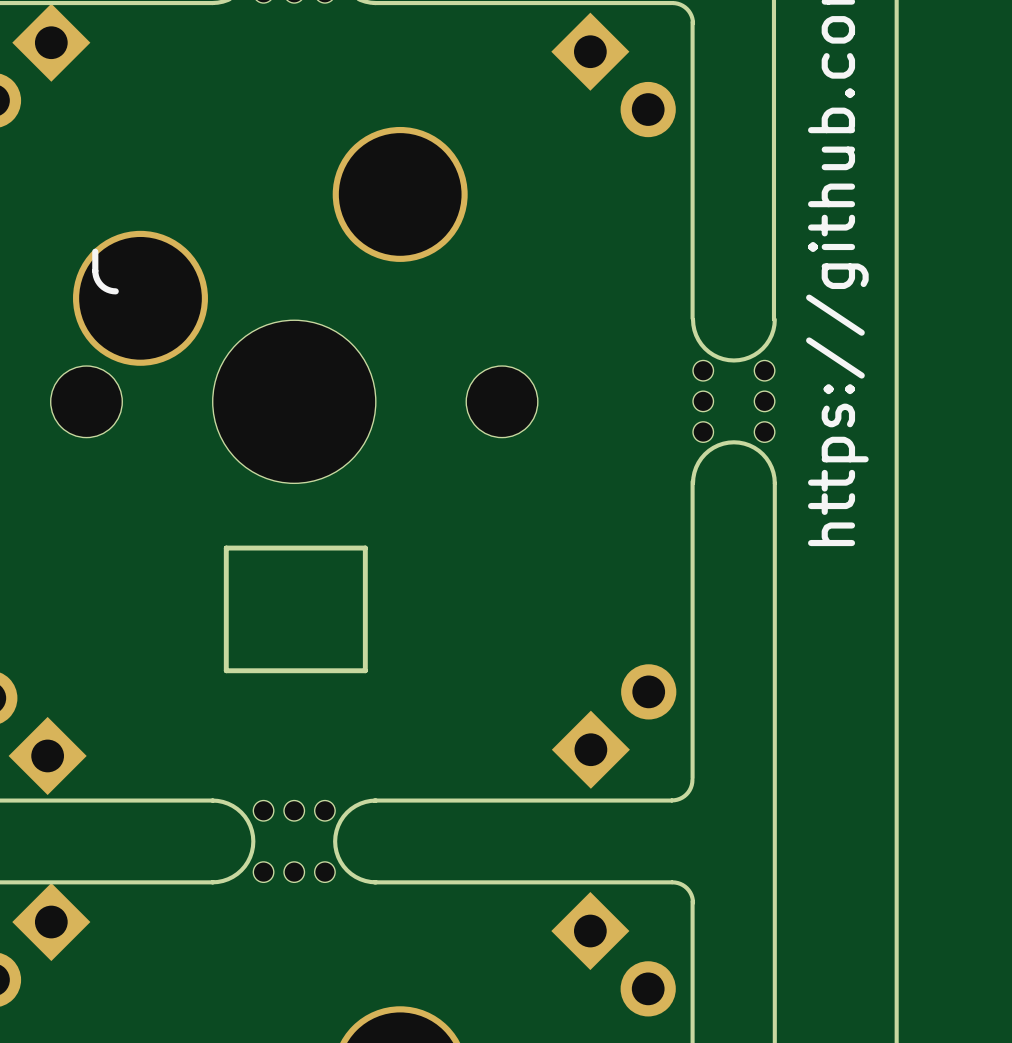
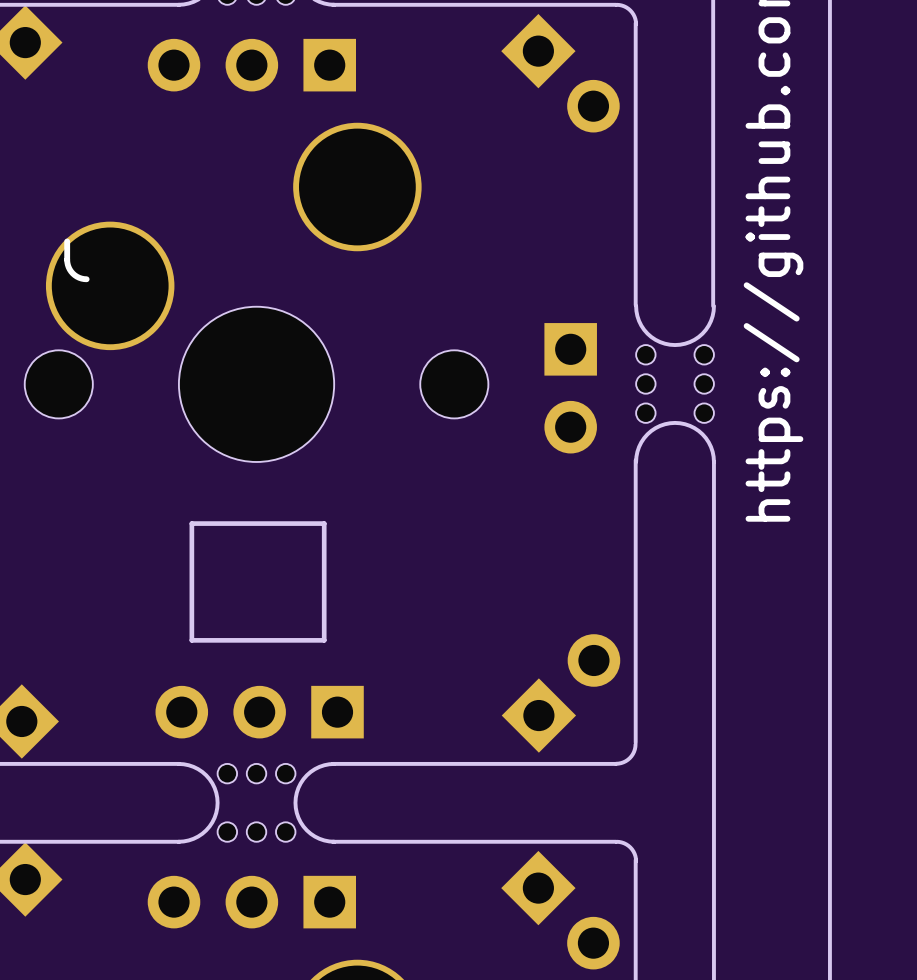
part: none -> (251, 65)
part: none -> (570, 388)
part: none -> (259, 712)
part: none -> (251, 902)

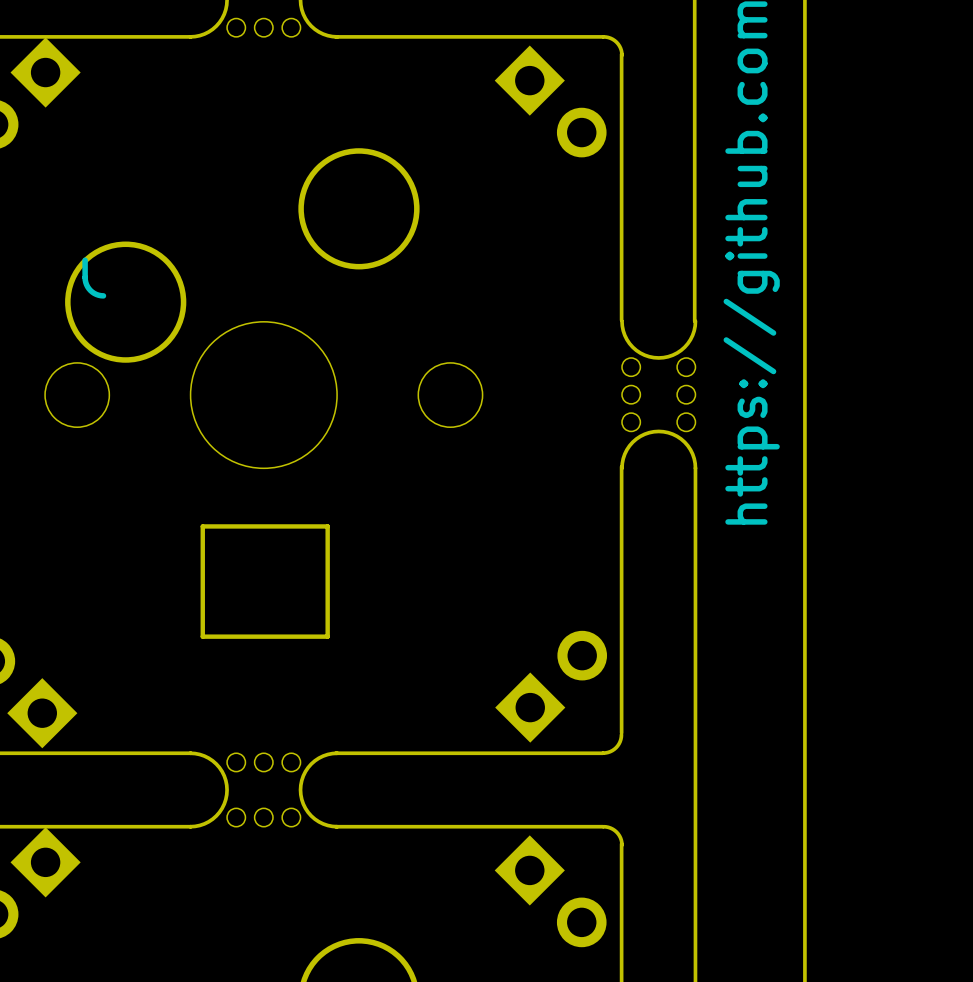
part: (251, 65) -> none
part: (570, 388) -> none
part: (259, 712) -> none
part: (251, 902) -> none

